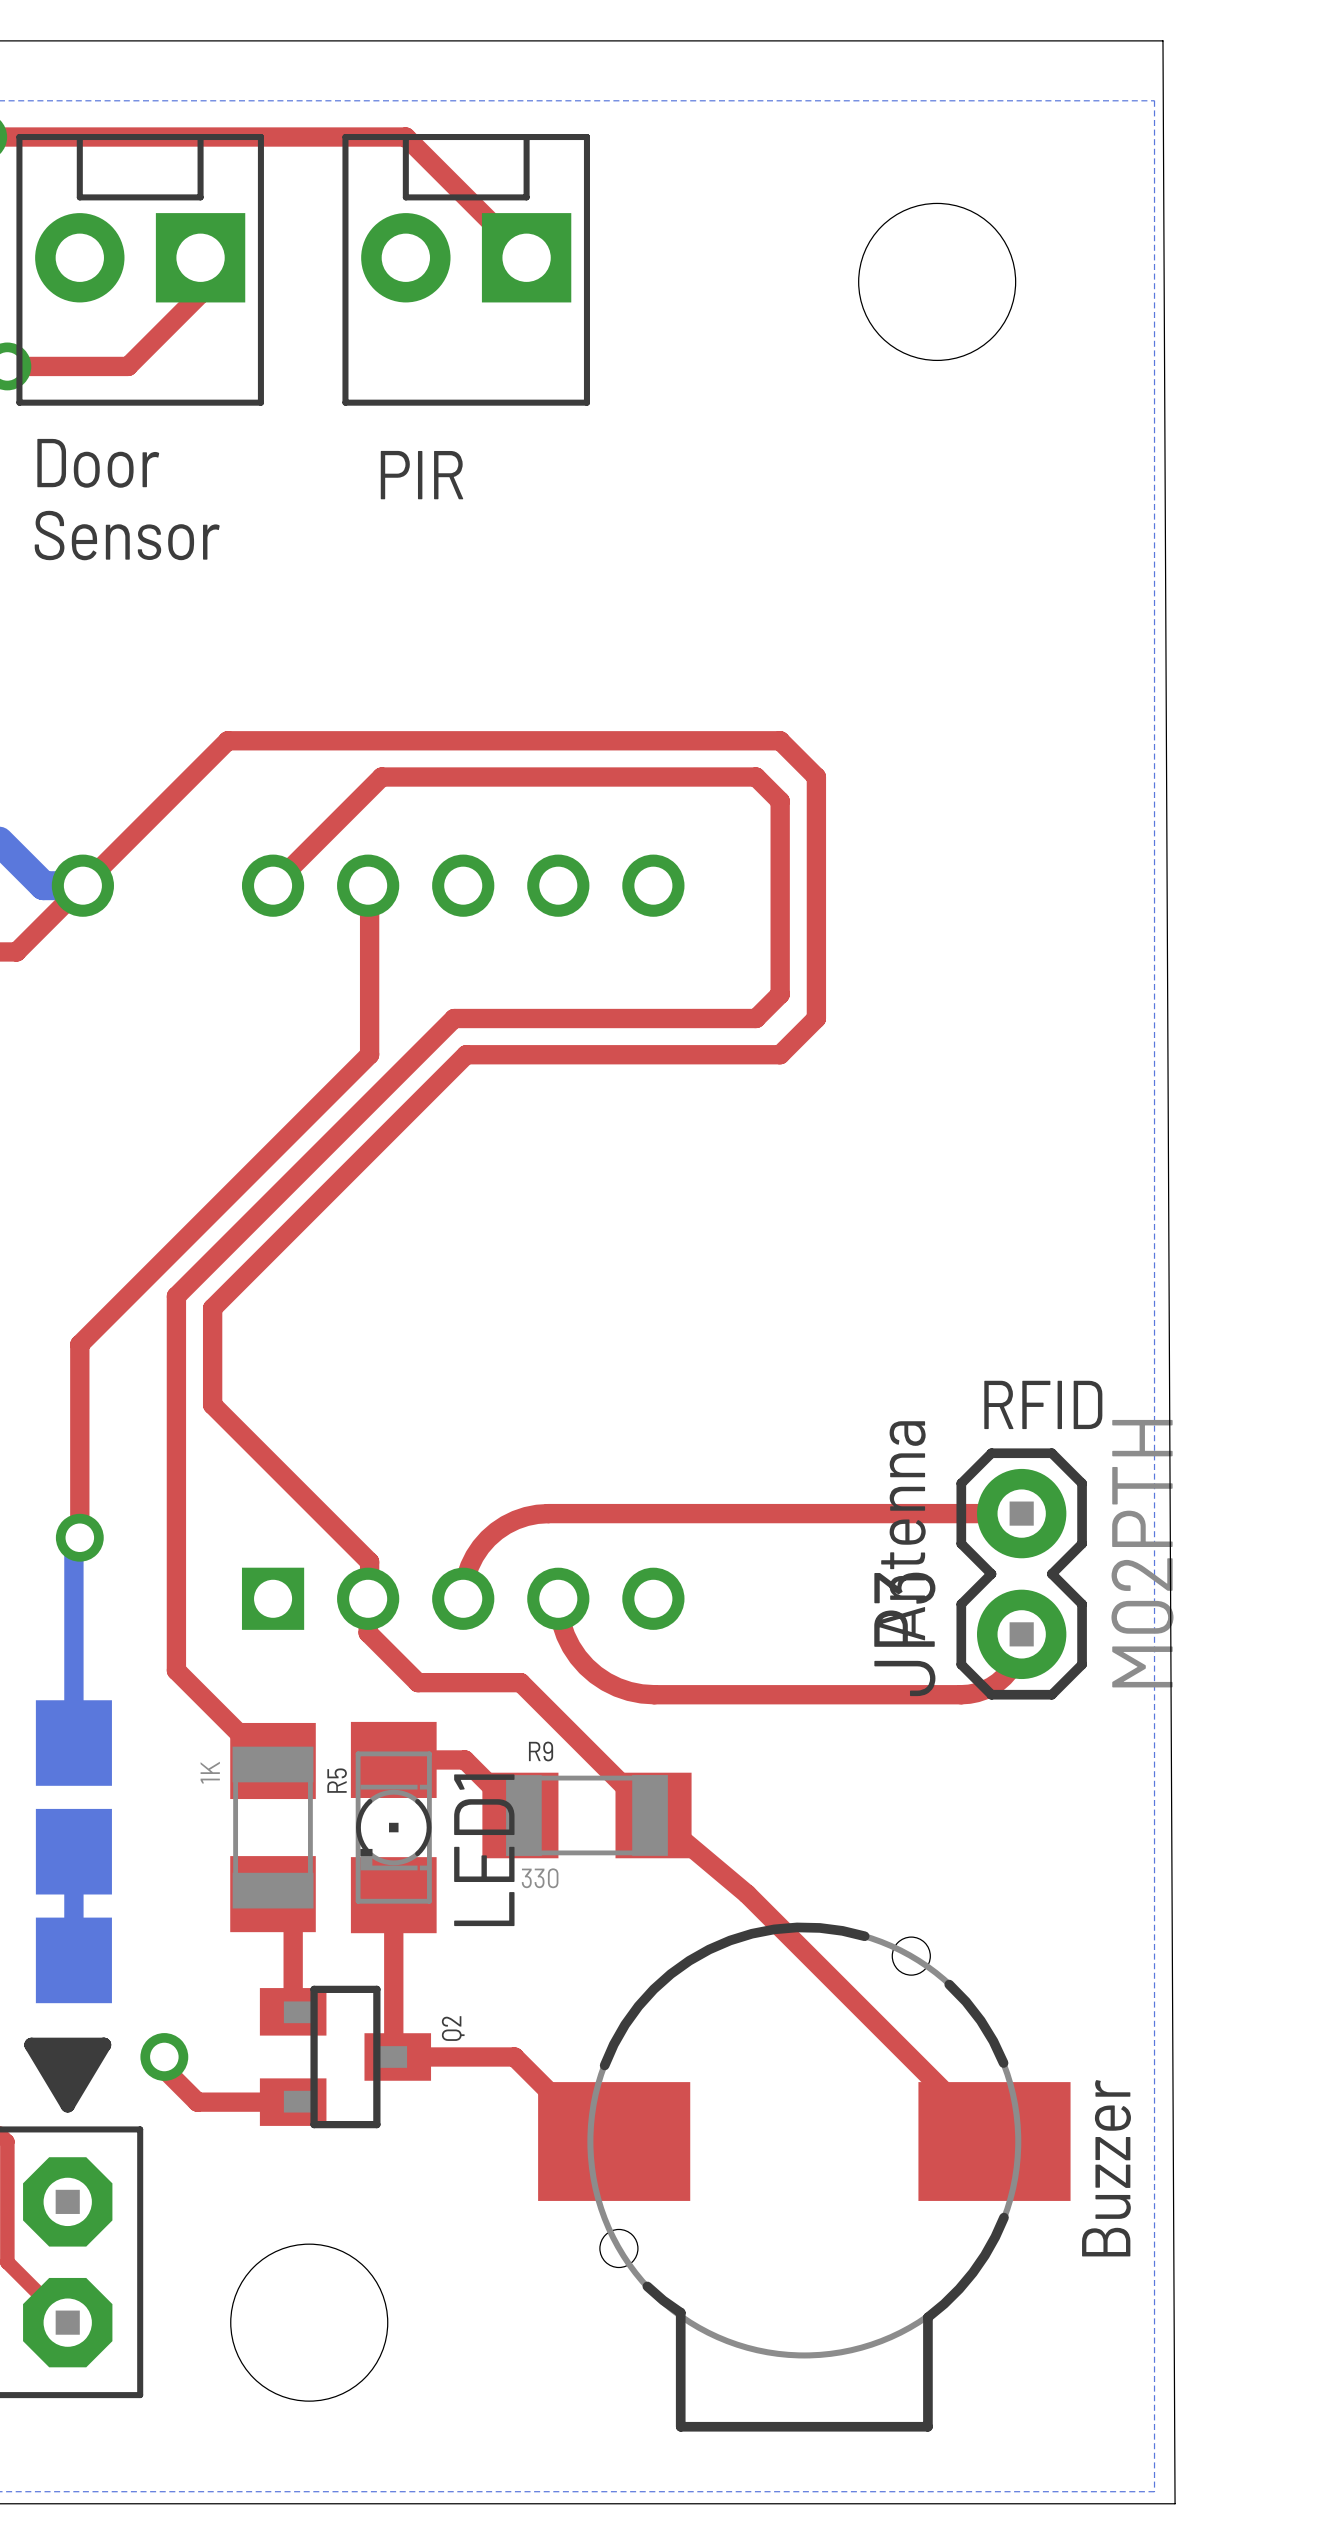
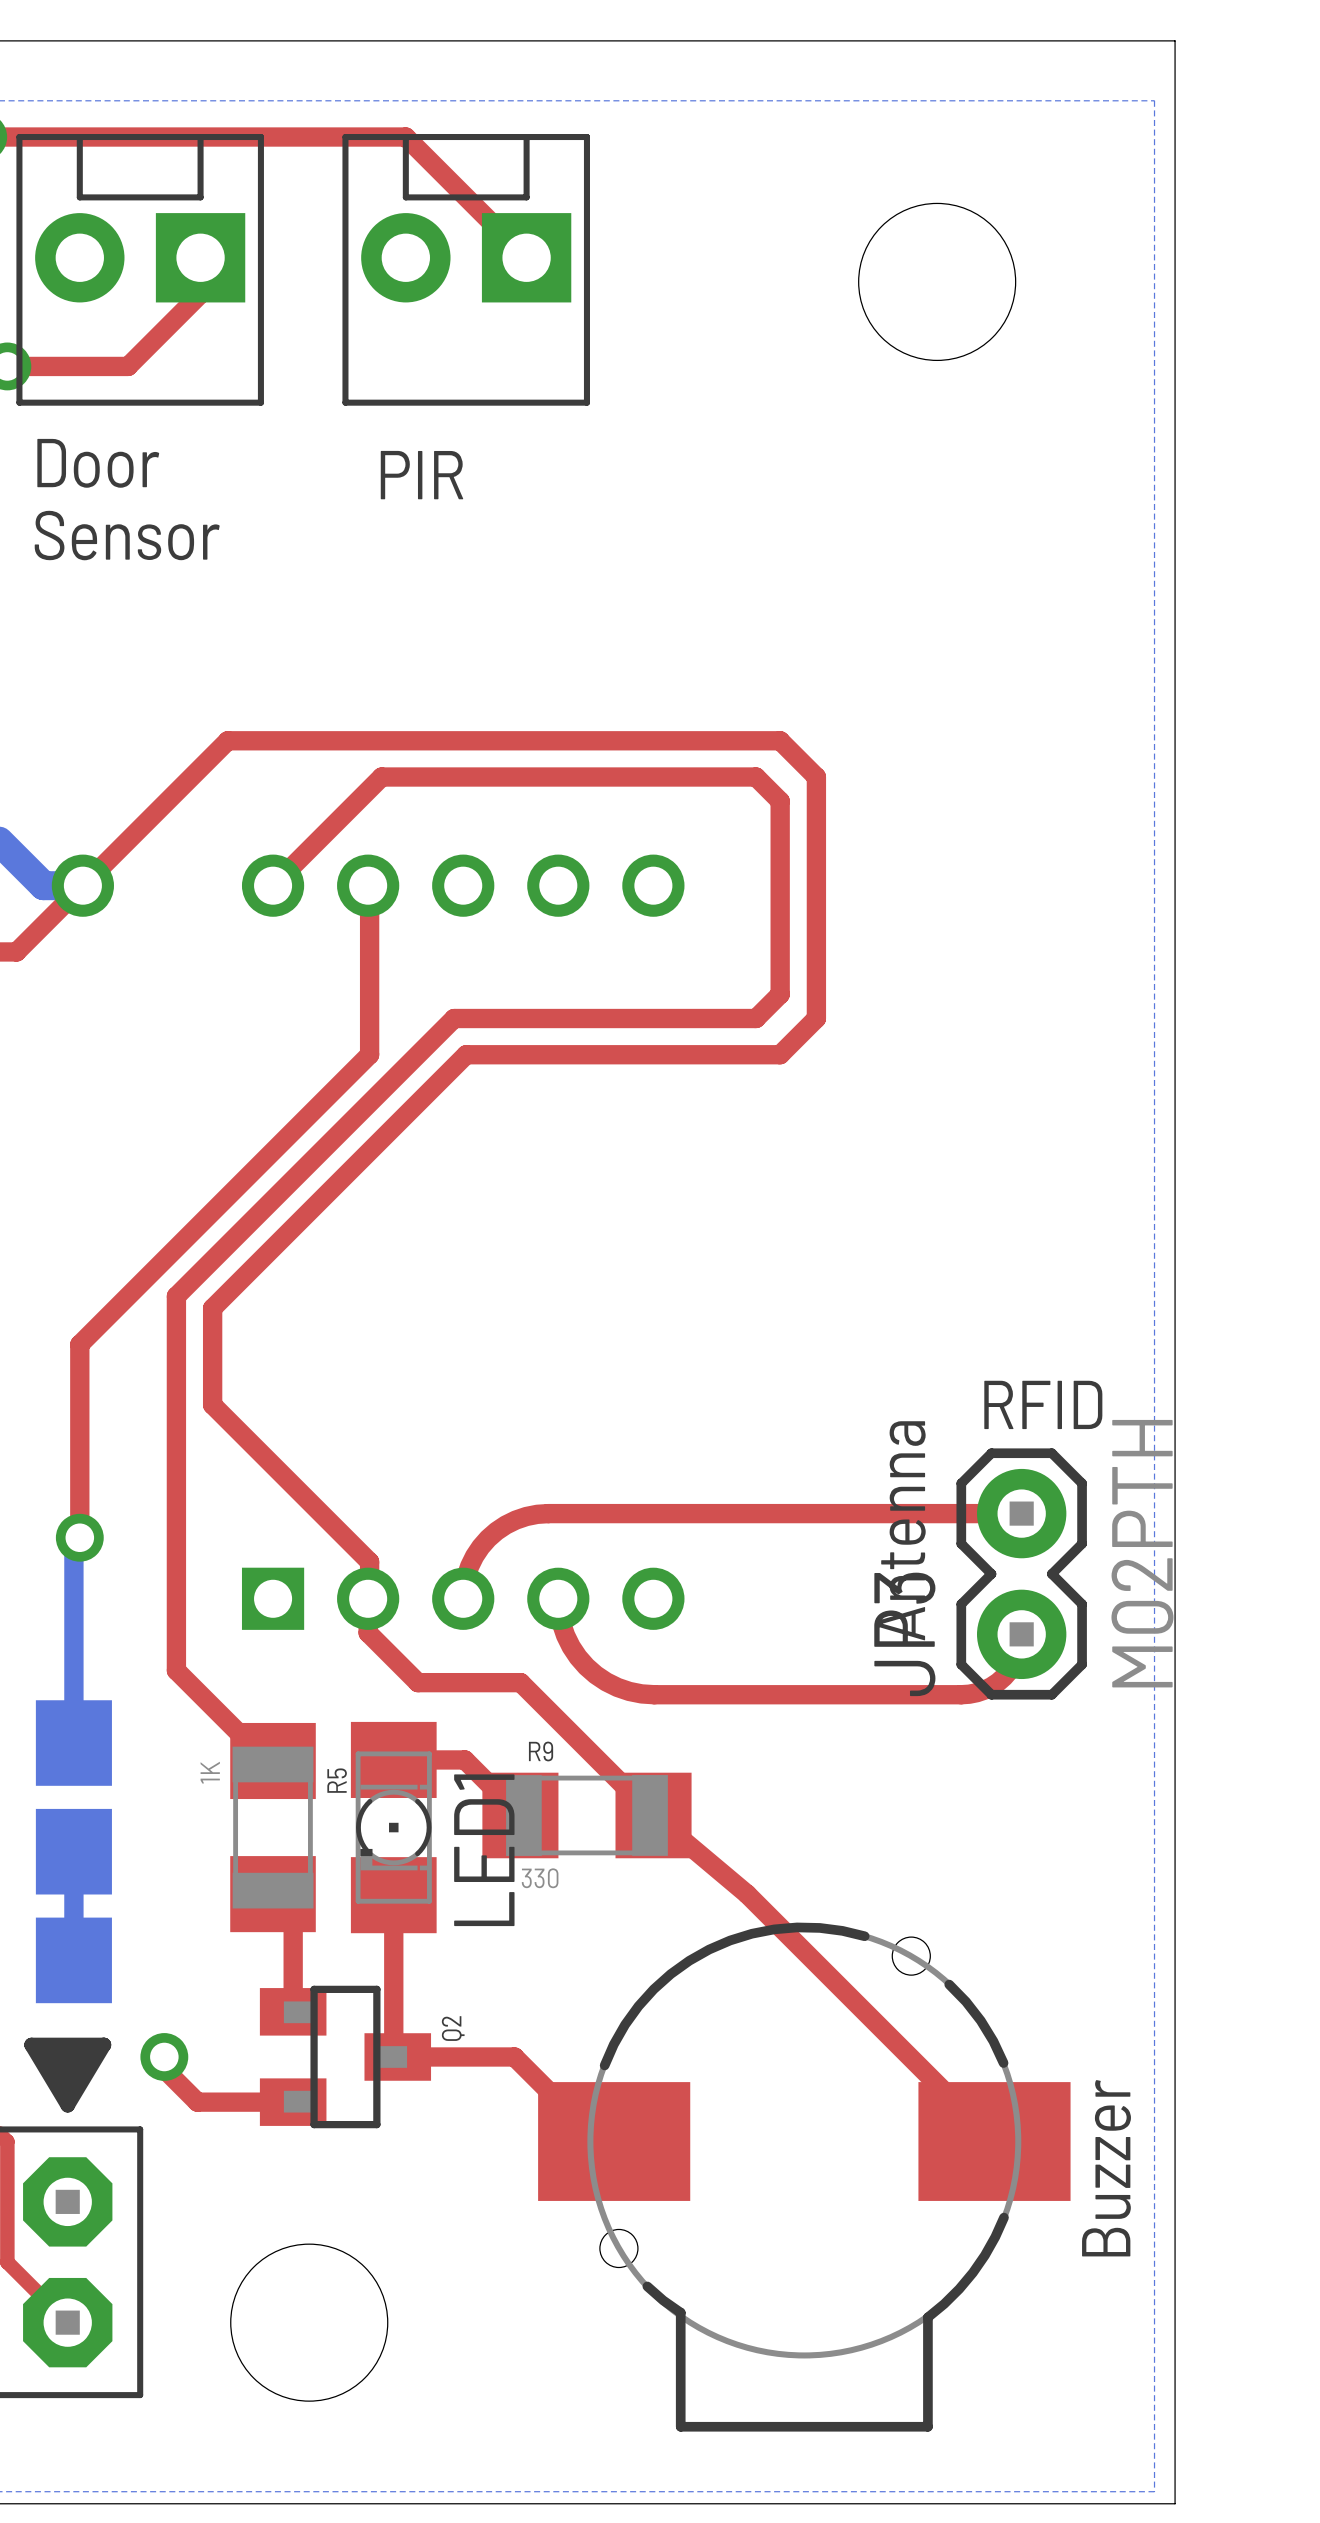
board edge: (1162, 40) (1175, 2503) -> (1162, 40) (1175, 40) (1175, 2503)

